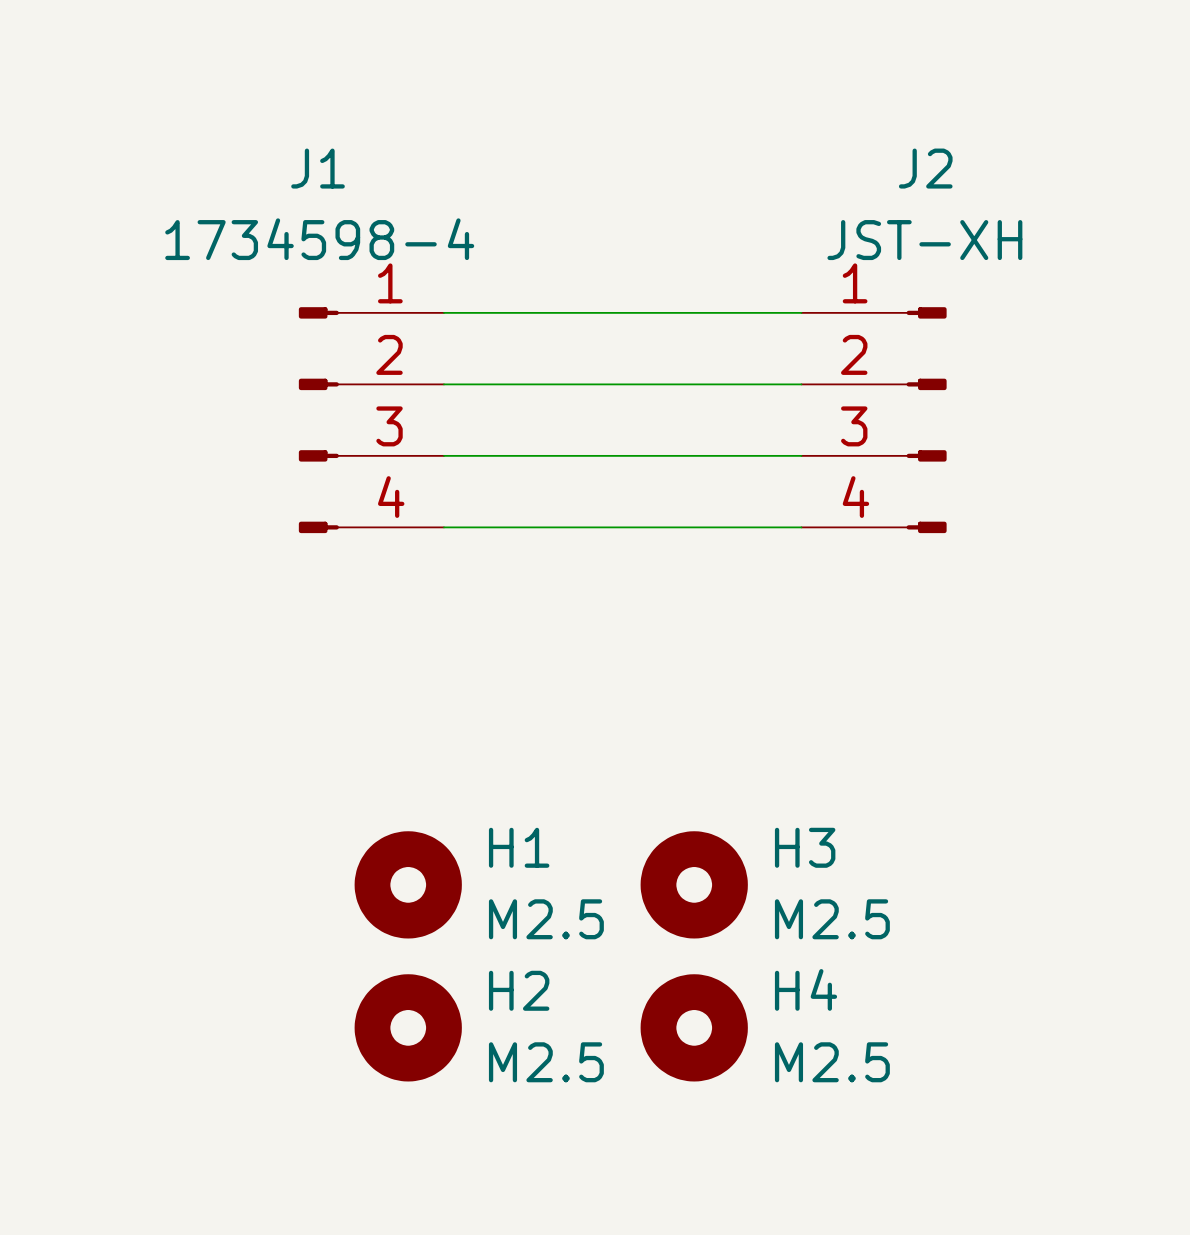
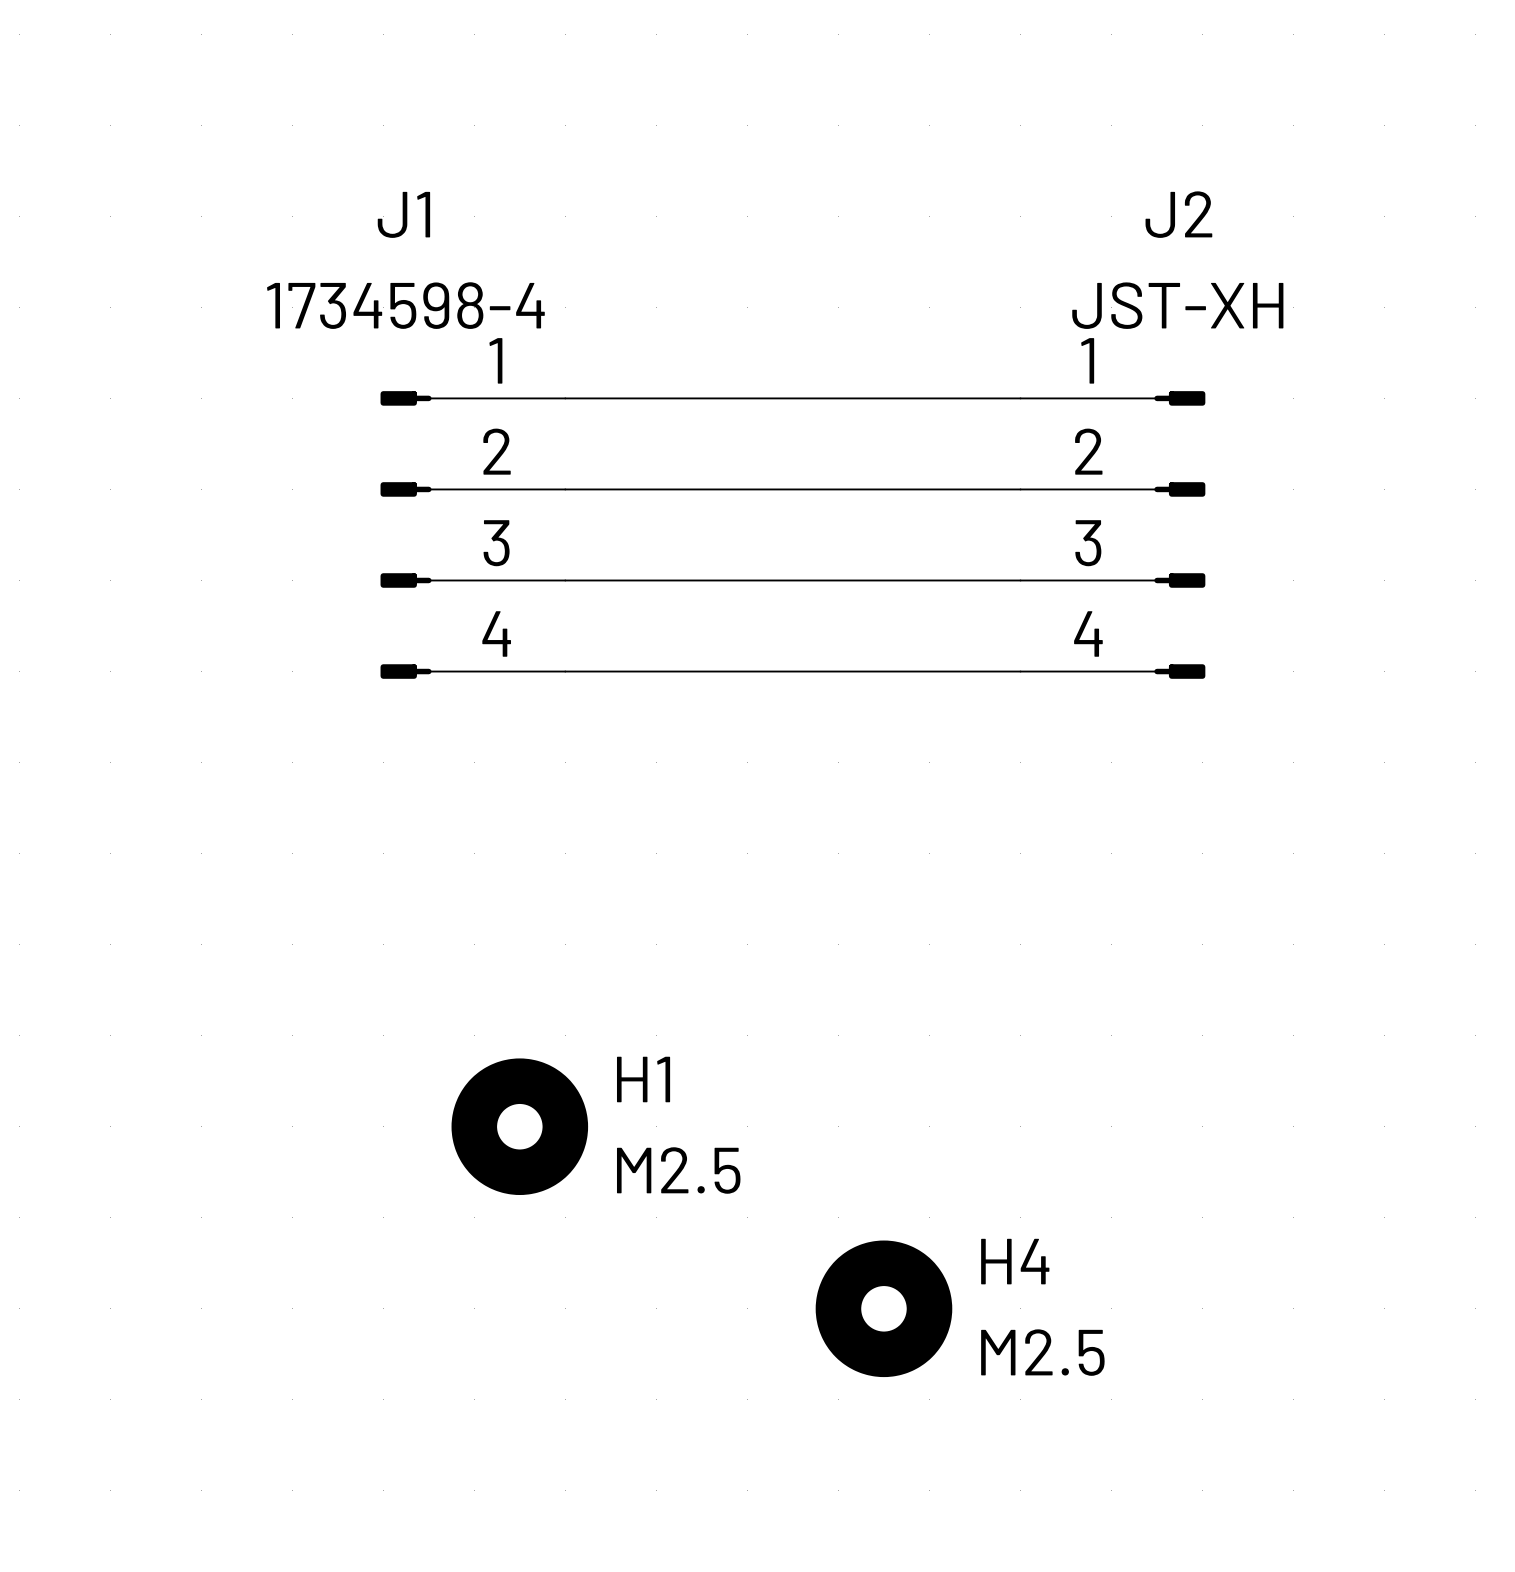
H3: M2.5 (694, 884) -> none
H2: M2.5 (408, 1027) -> none

